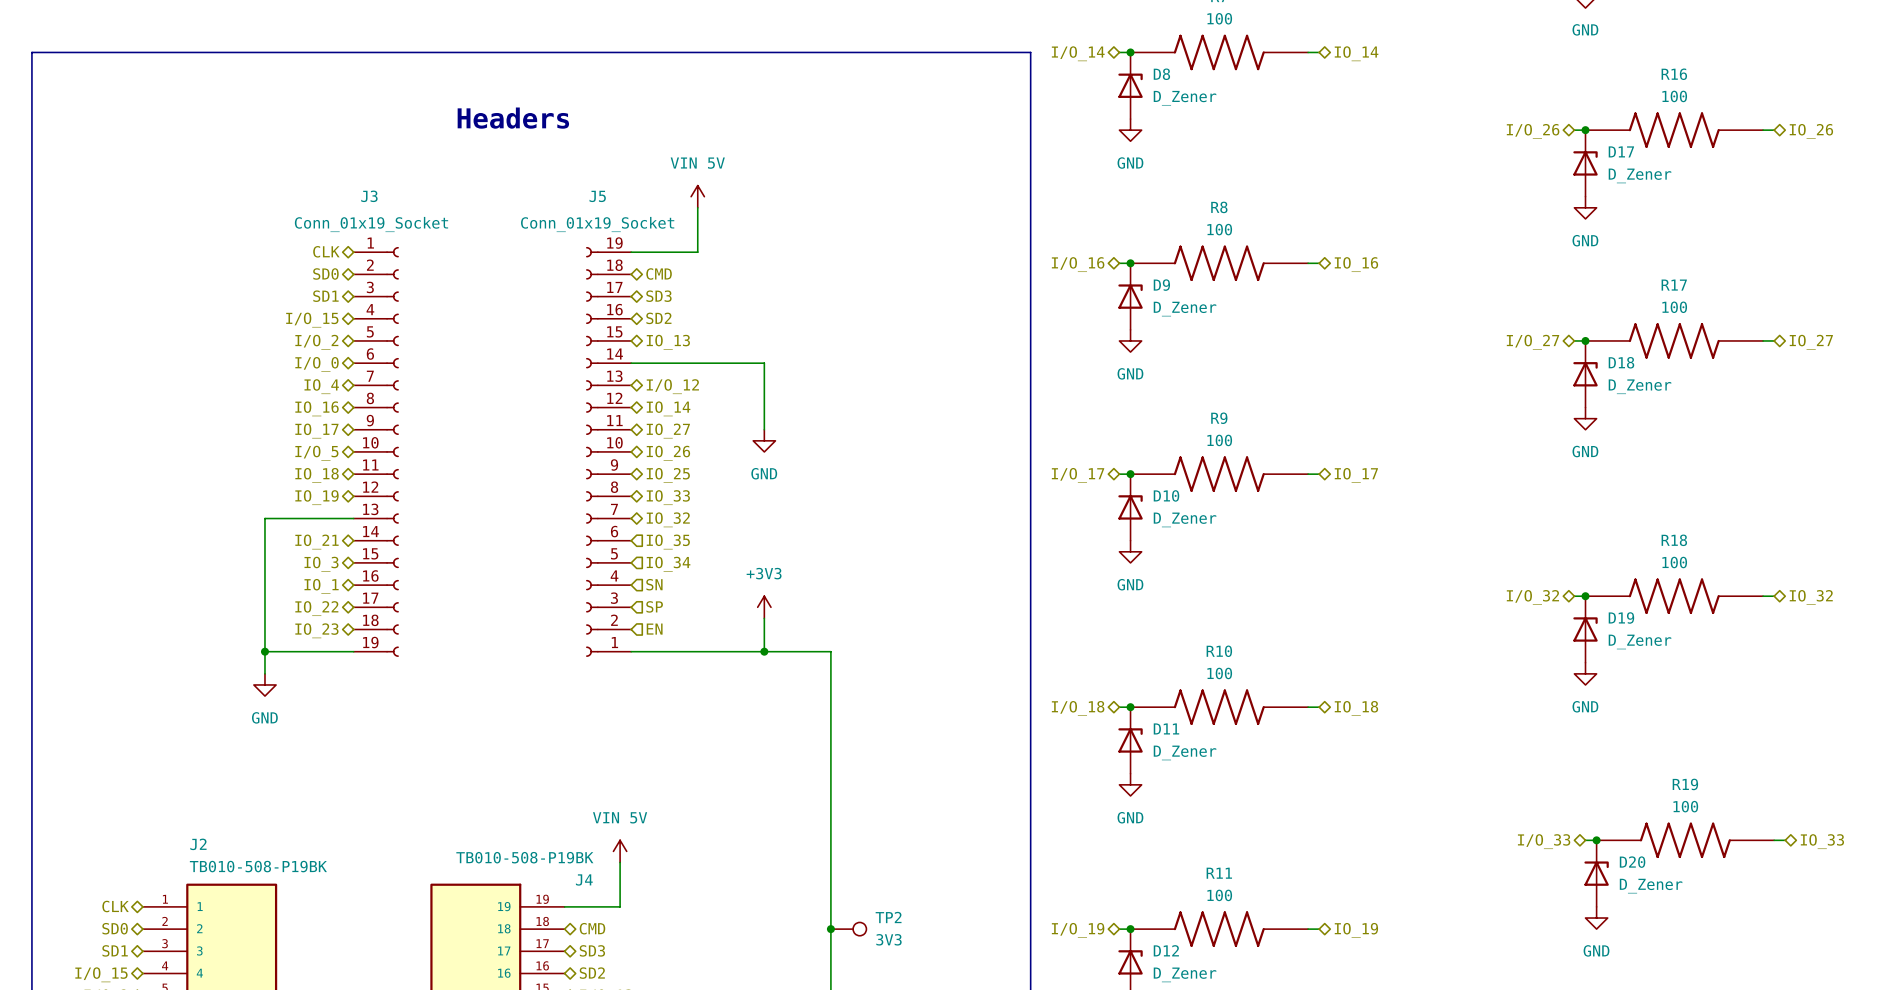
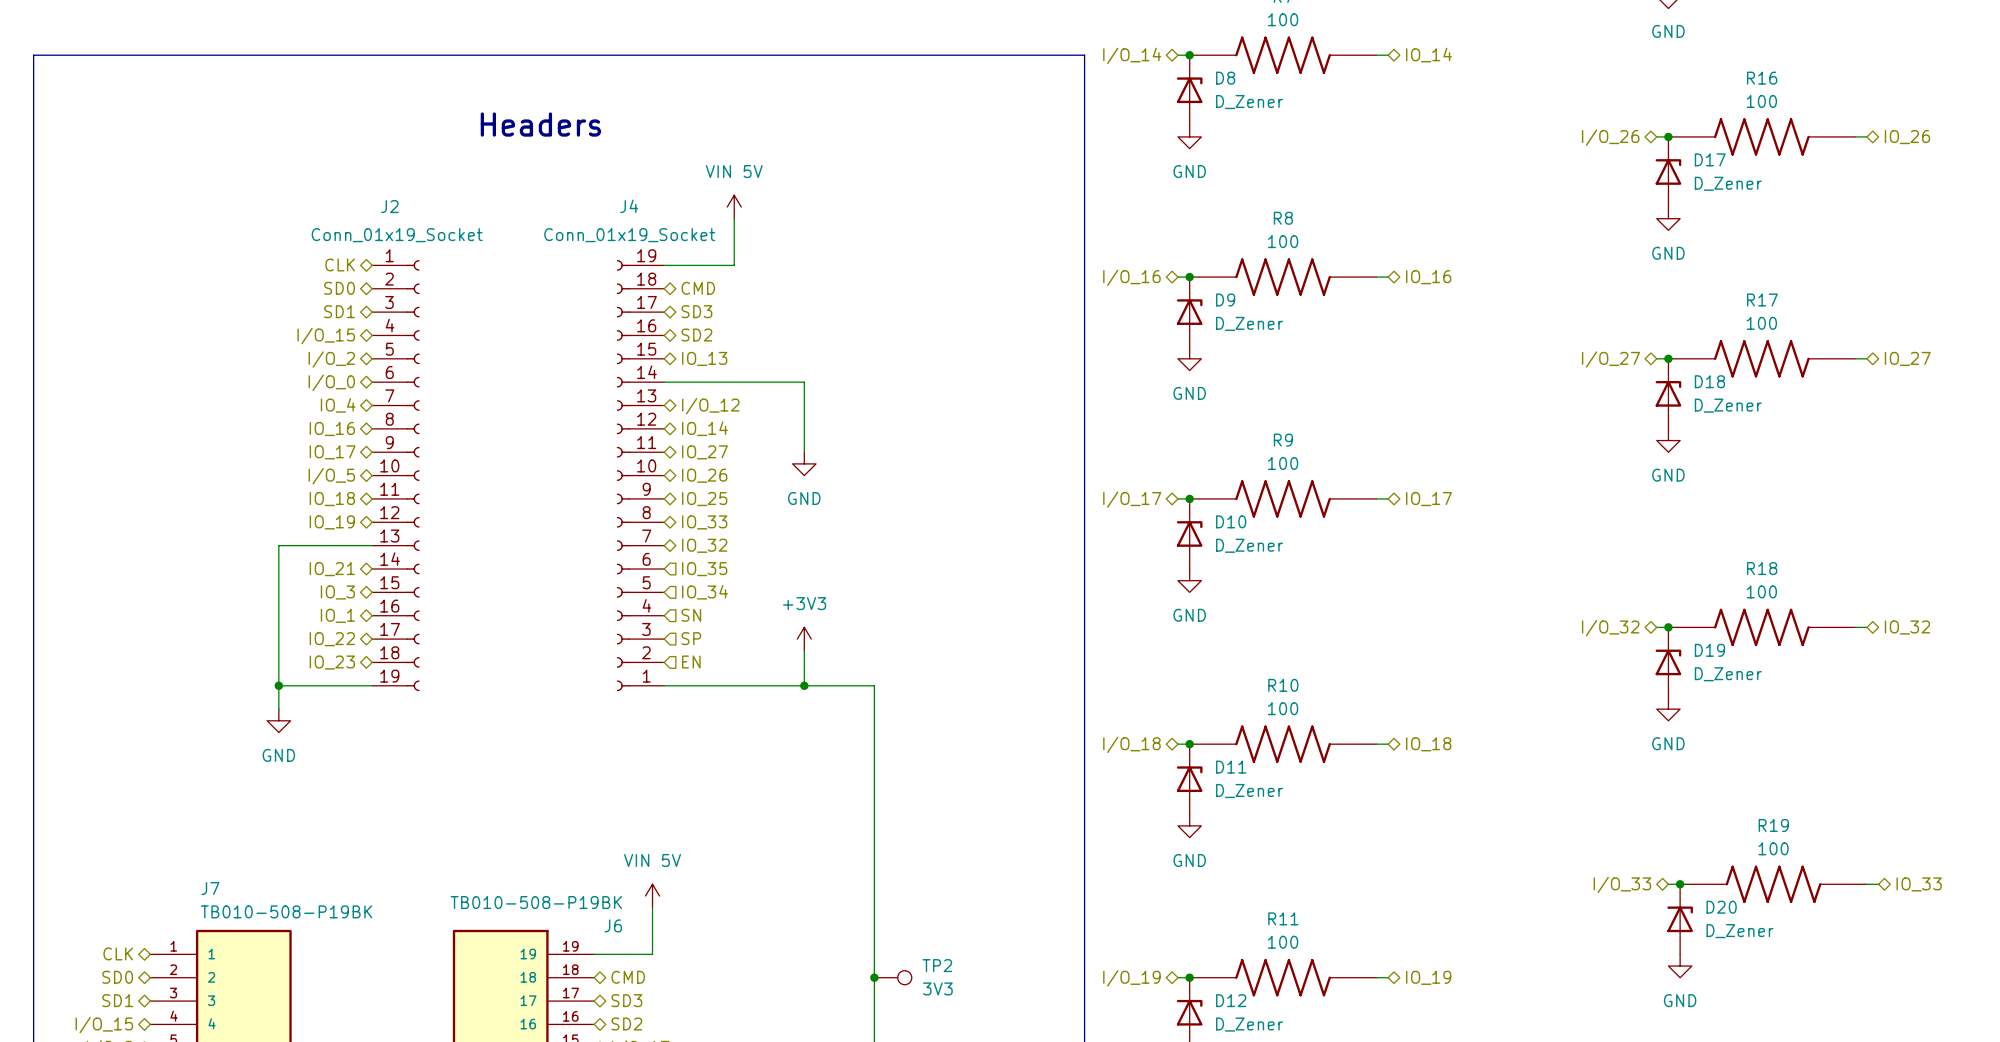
J3 name: J3 (369, 196) -> J2 (389, 206)
J5 name: J5 (597, 196) -> J4 (629, 206)
J2 name: J2 (198, 844) -> J7 (210, 888)
J4 name: J4 (584, 879) -> J6 (613, 925)

